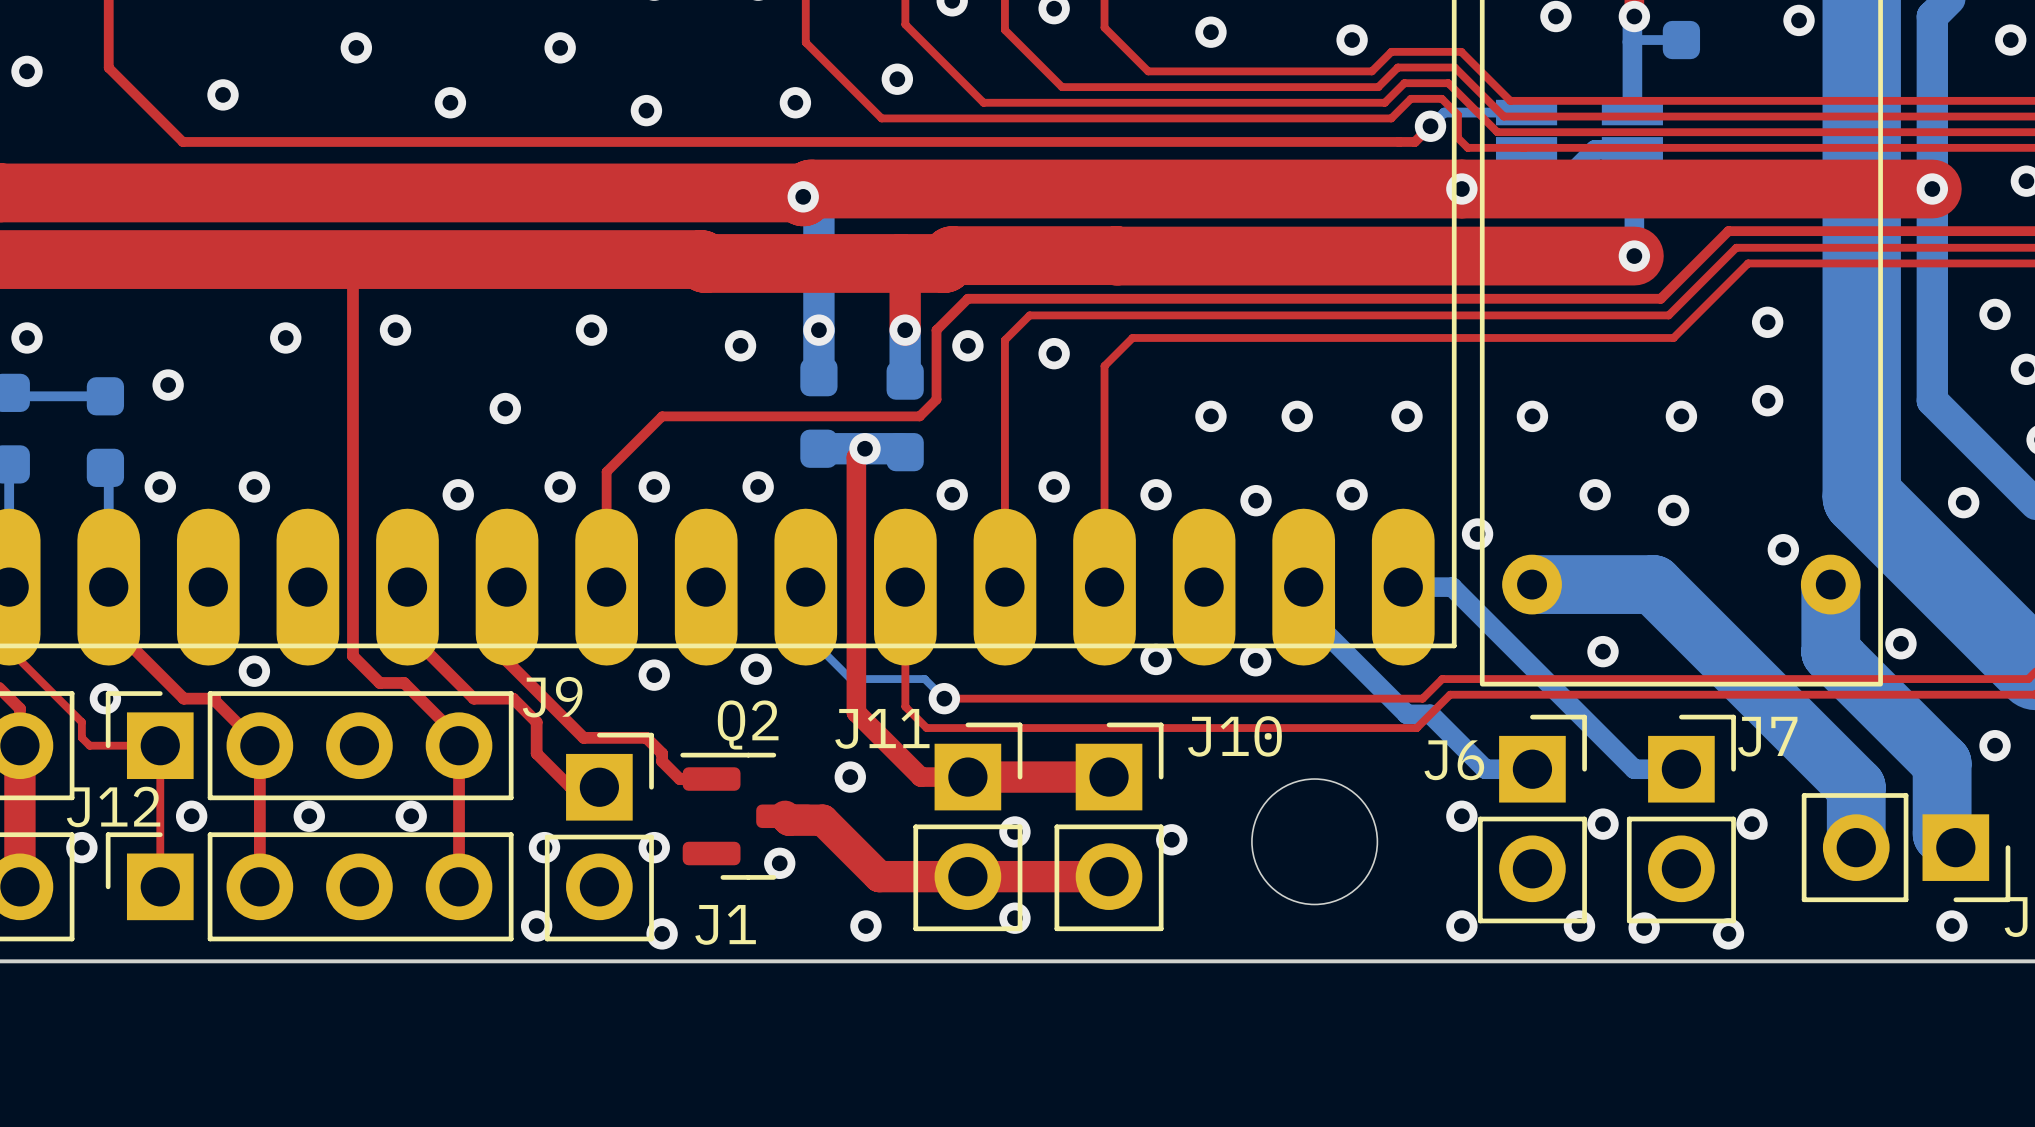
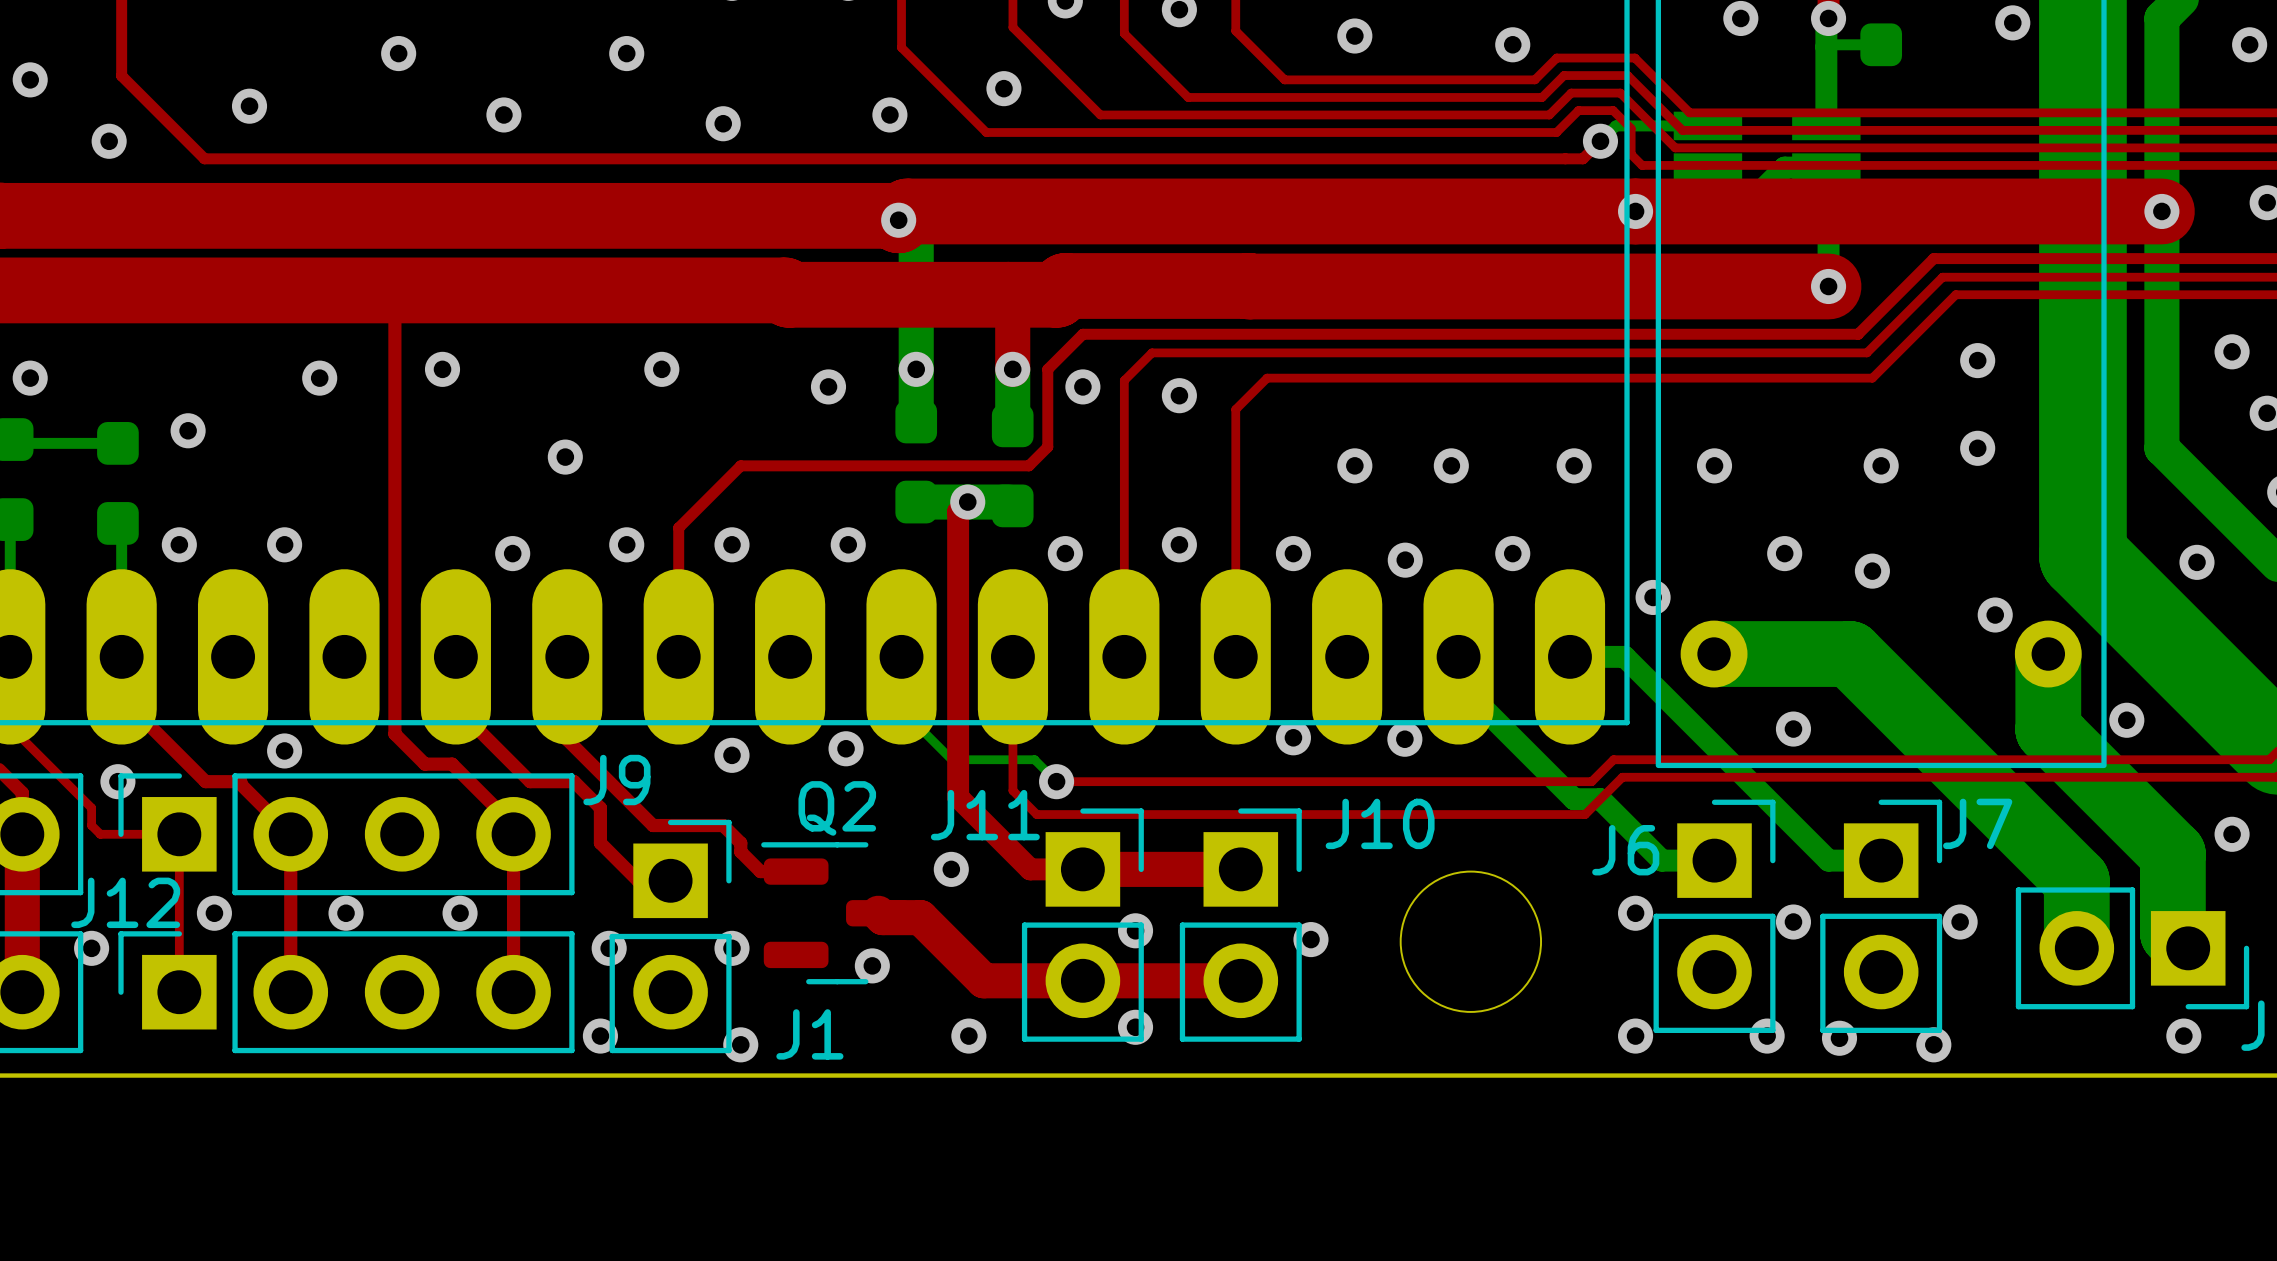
via: none -> (109, 141)

